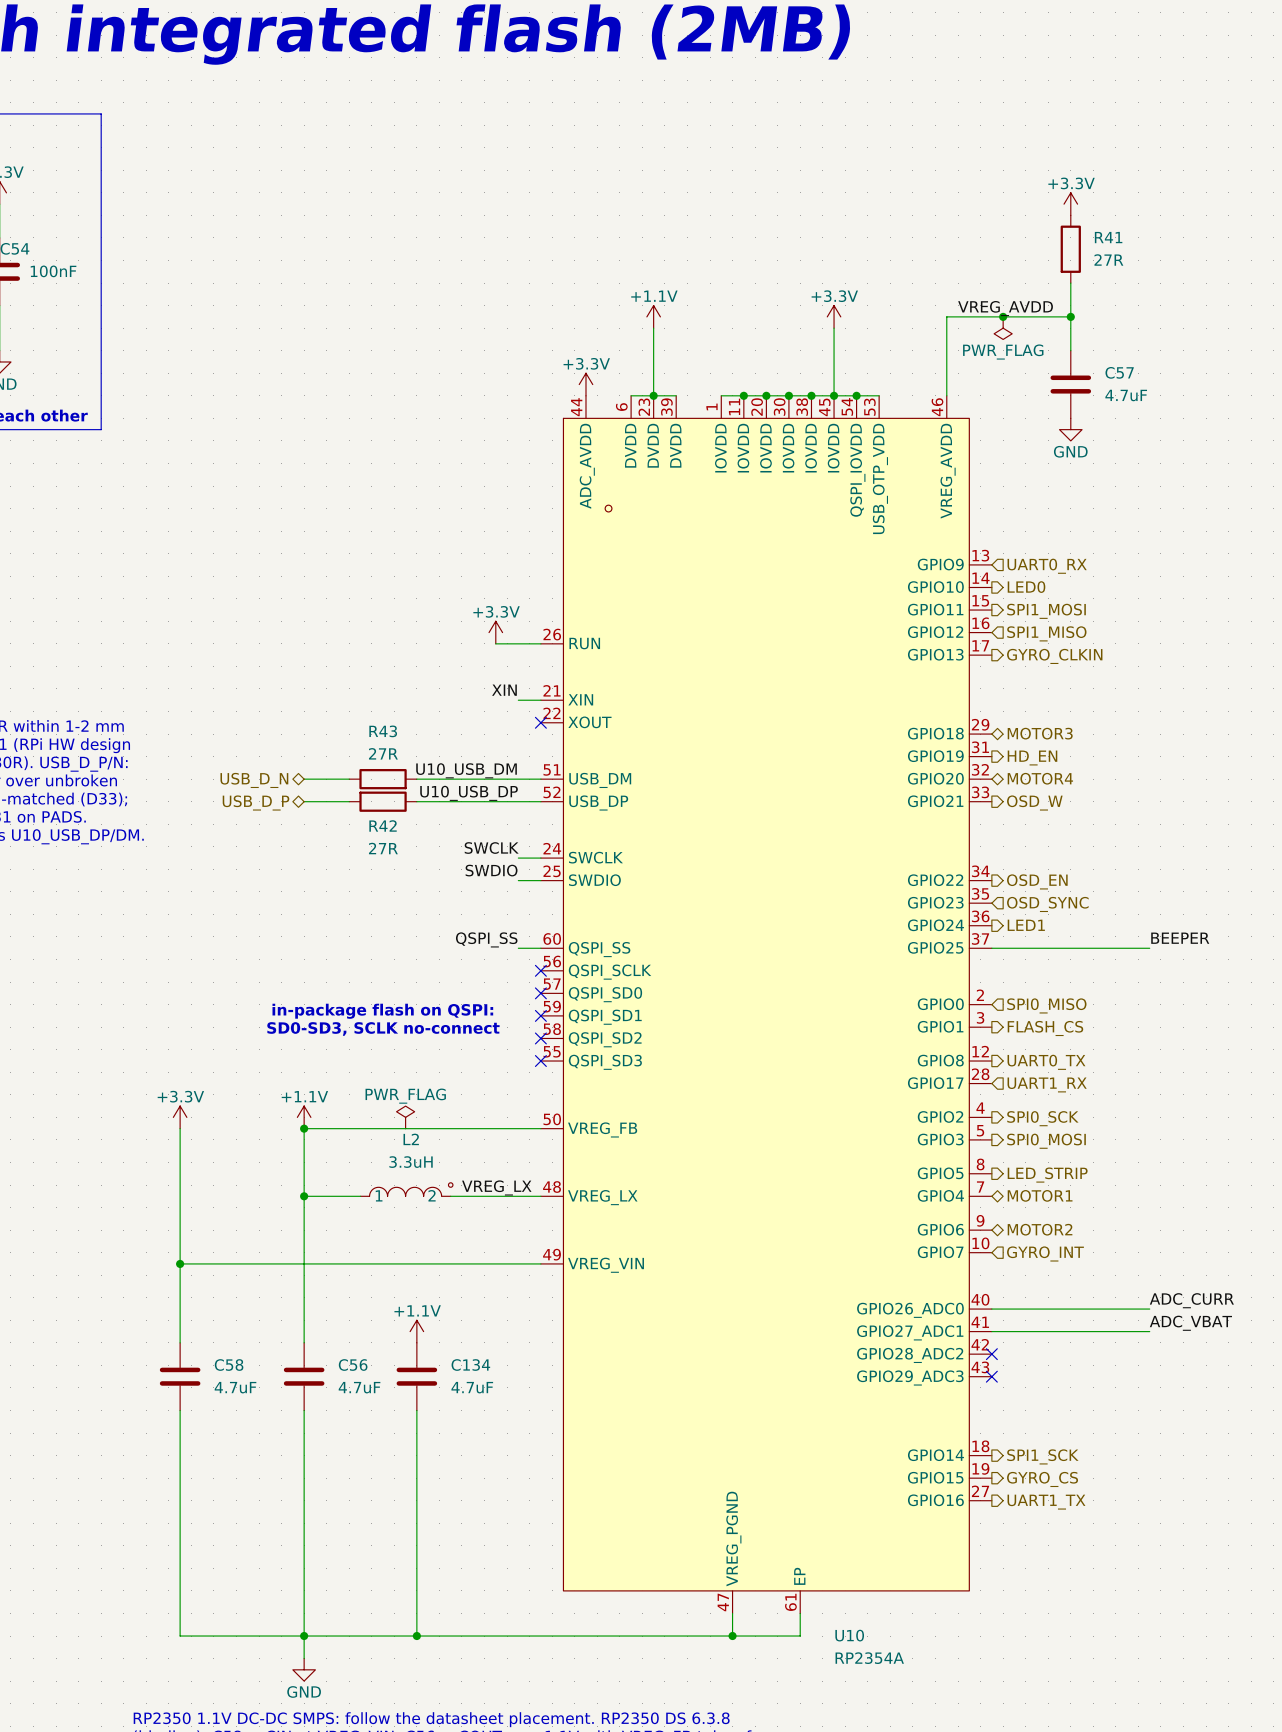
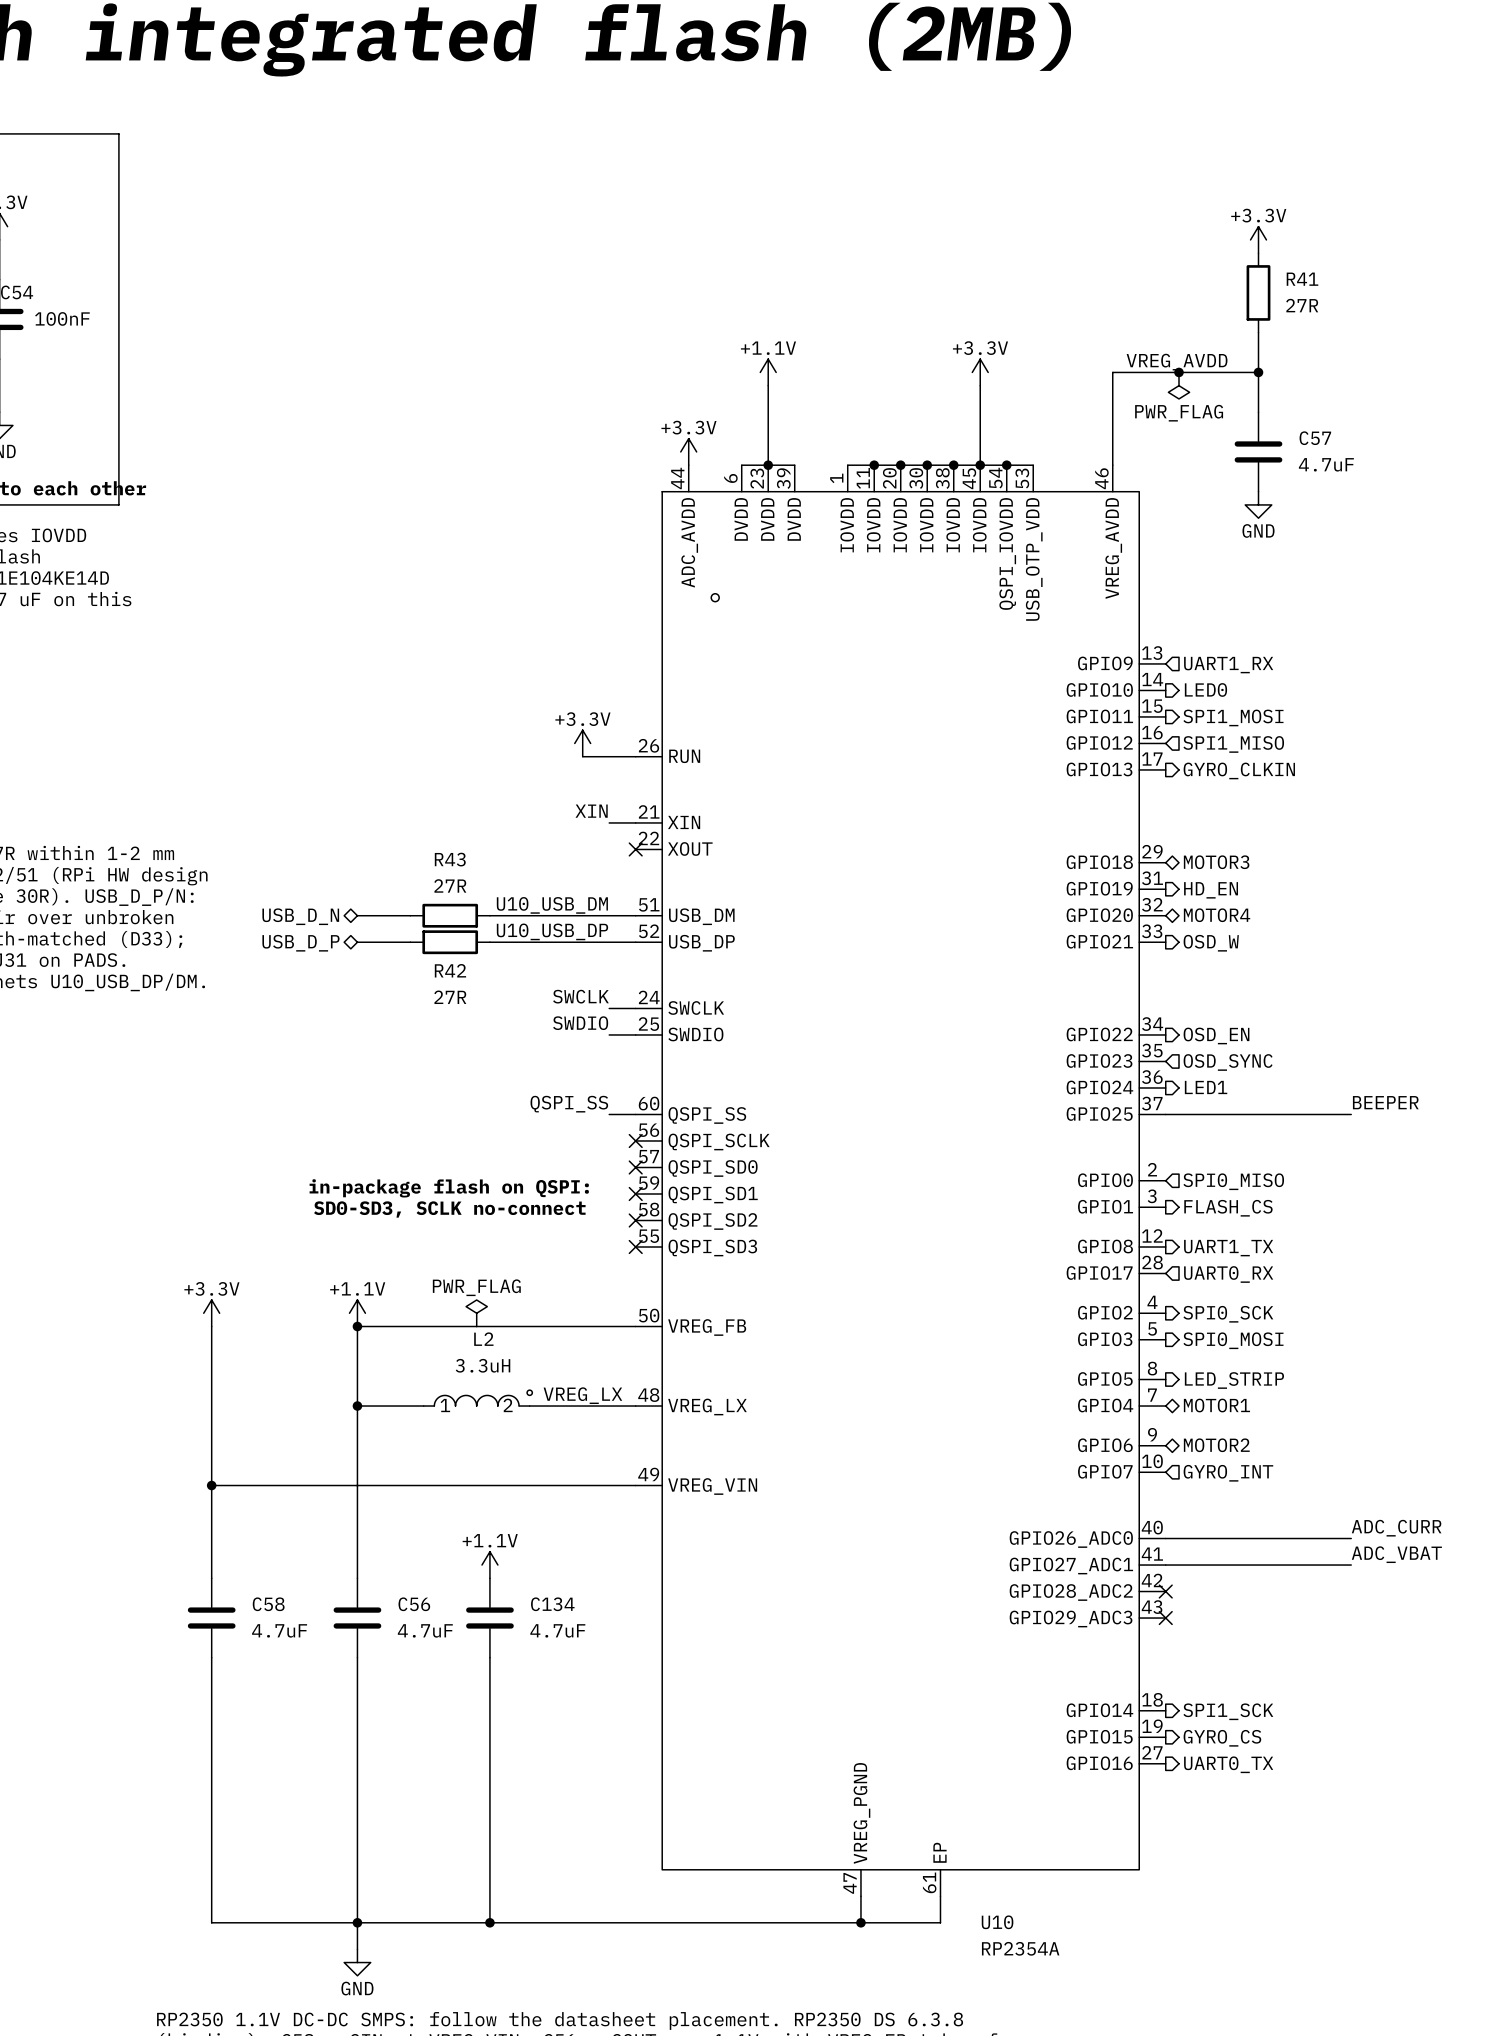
hierarchical label: UART0_RX (1047, 566) -> UART1_RX (1228, 665)
hierarchical label: UART0_TX (1046, 1062) -> UART1_TX (1228, 1248)
hierarchical label: UART1_RX (1047, 1084) -> UART0_RX (1228, 1274)
hierarchical label: UART1_TX (1046, 1502) -> UART0_TX (1228, 1764)

